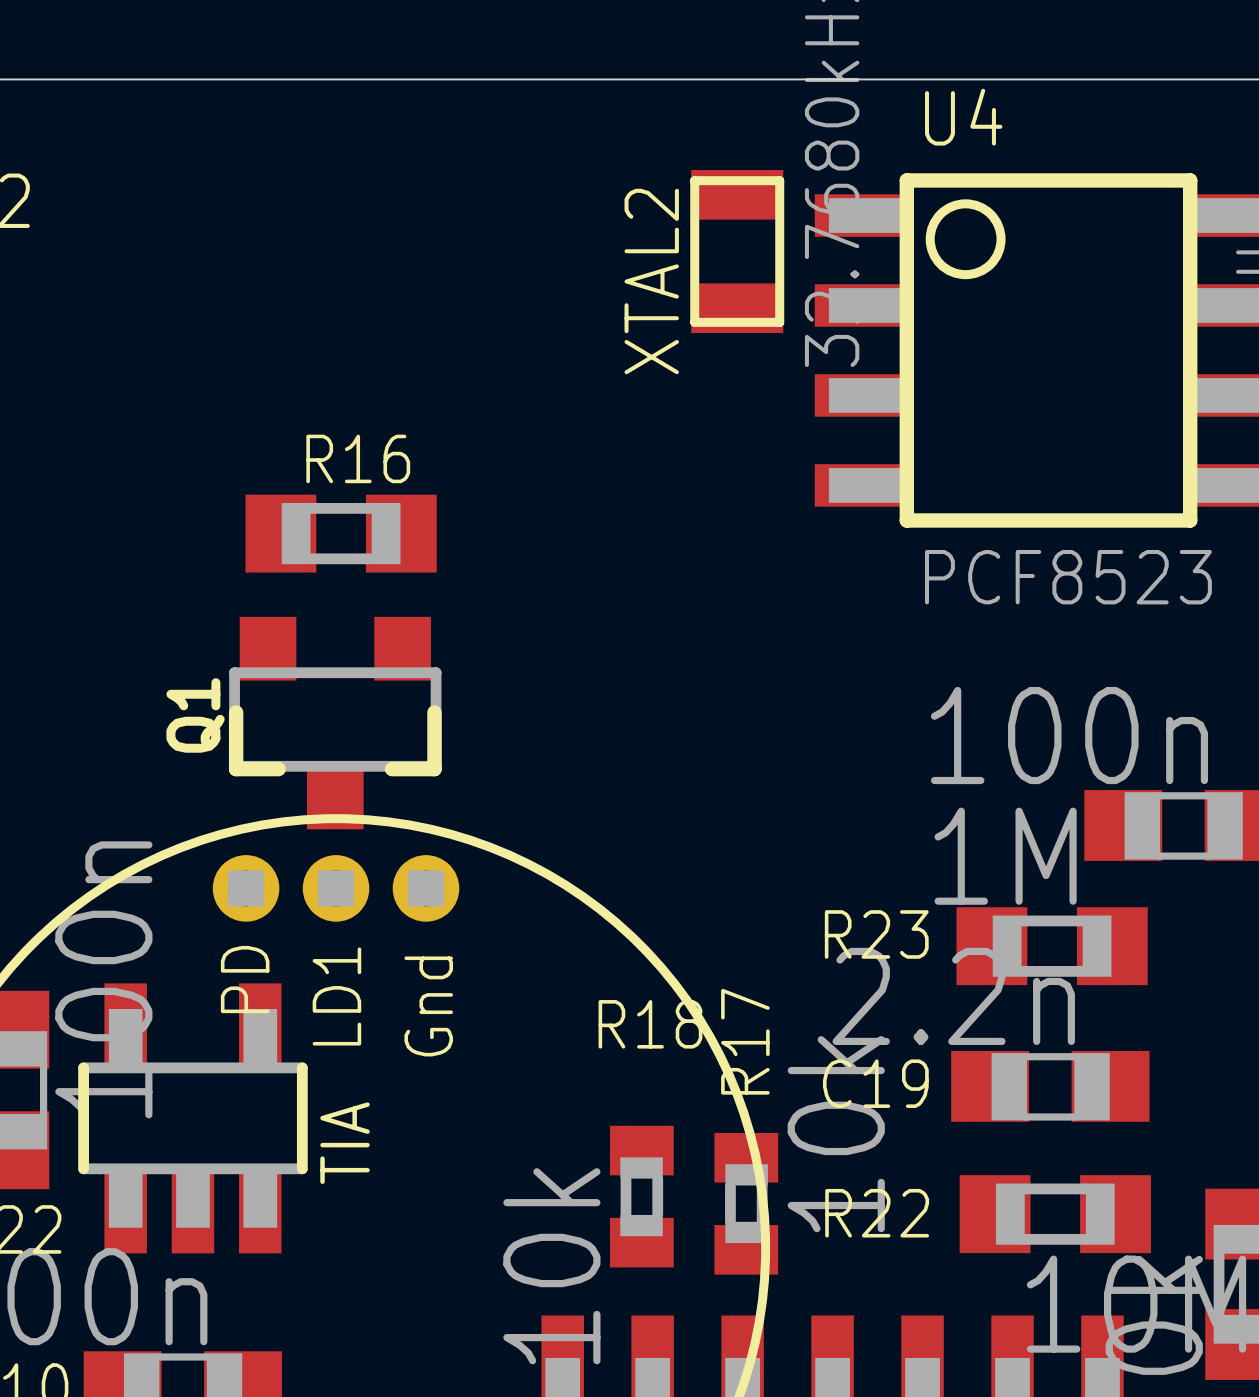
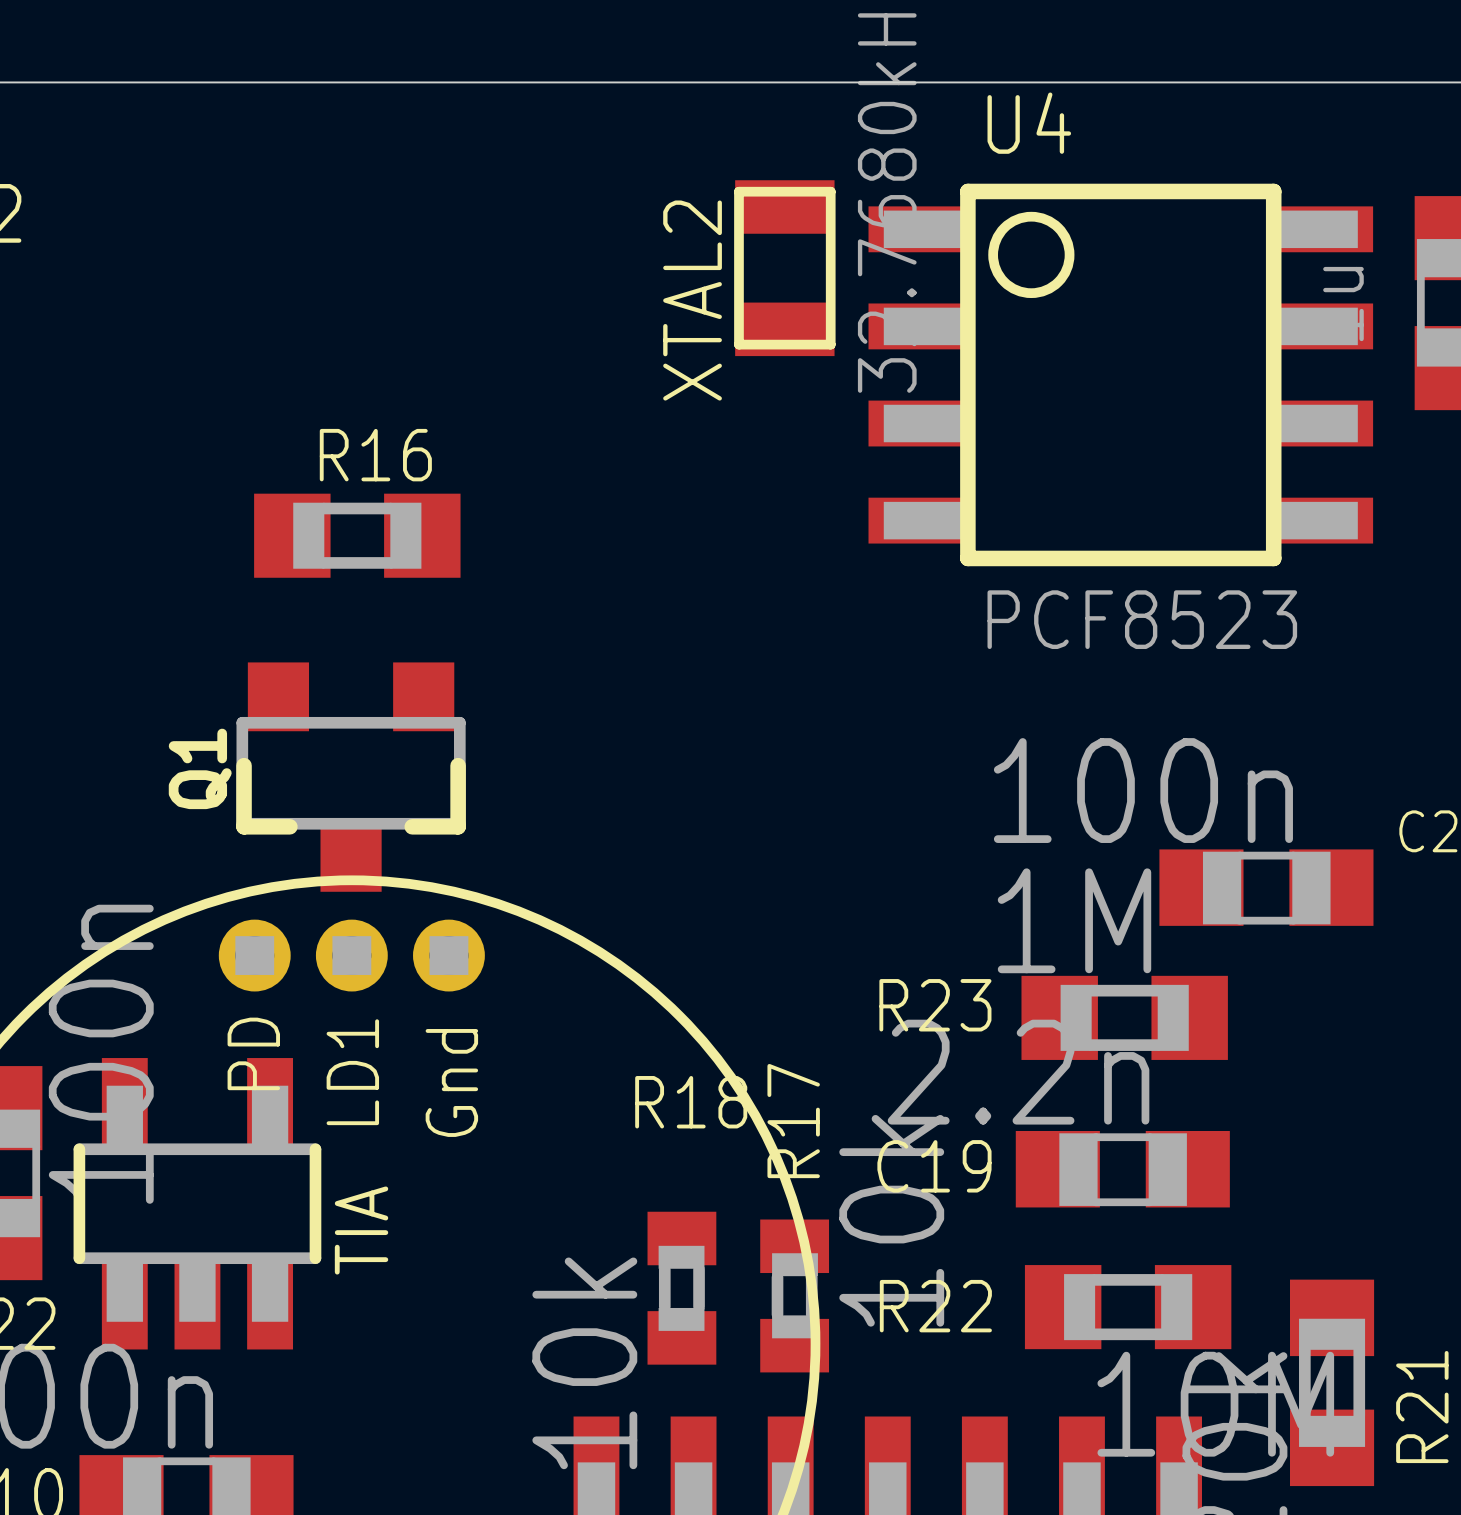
R16 position: (341, 533) -> (357, 535)

